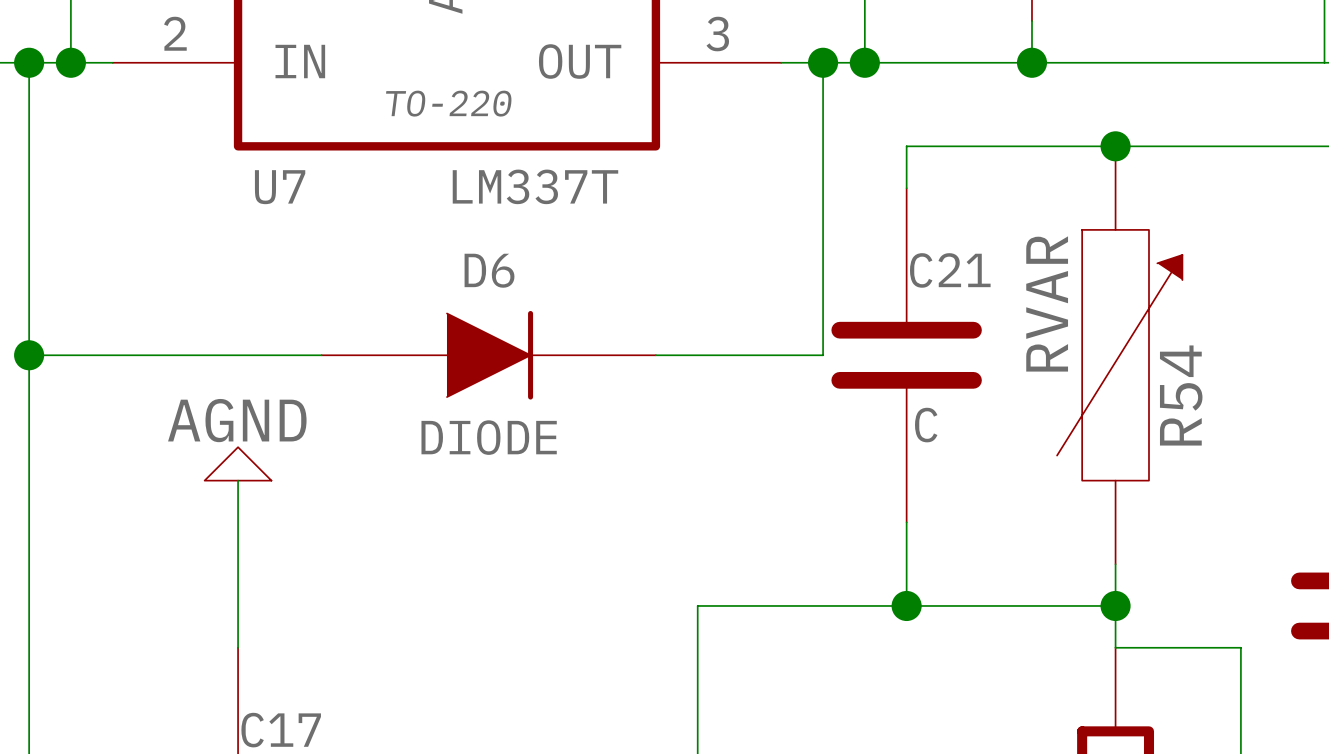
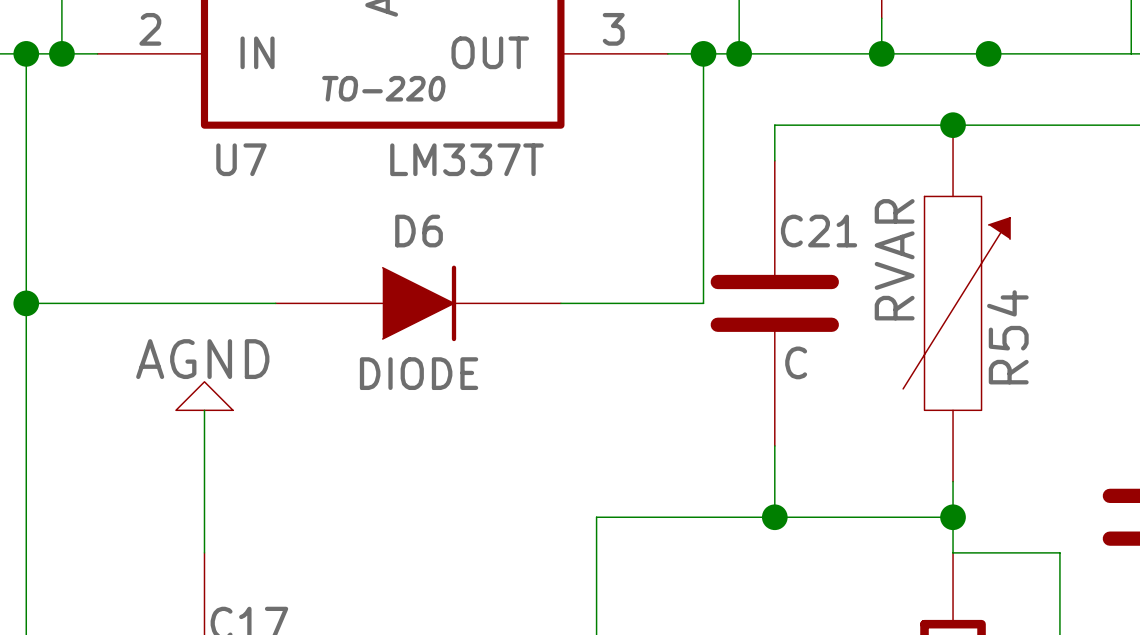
junction: none -> (988, 53)

